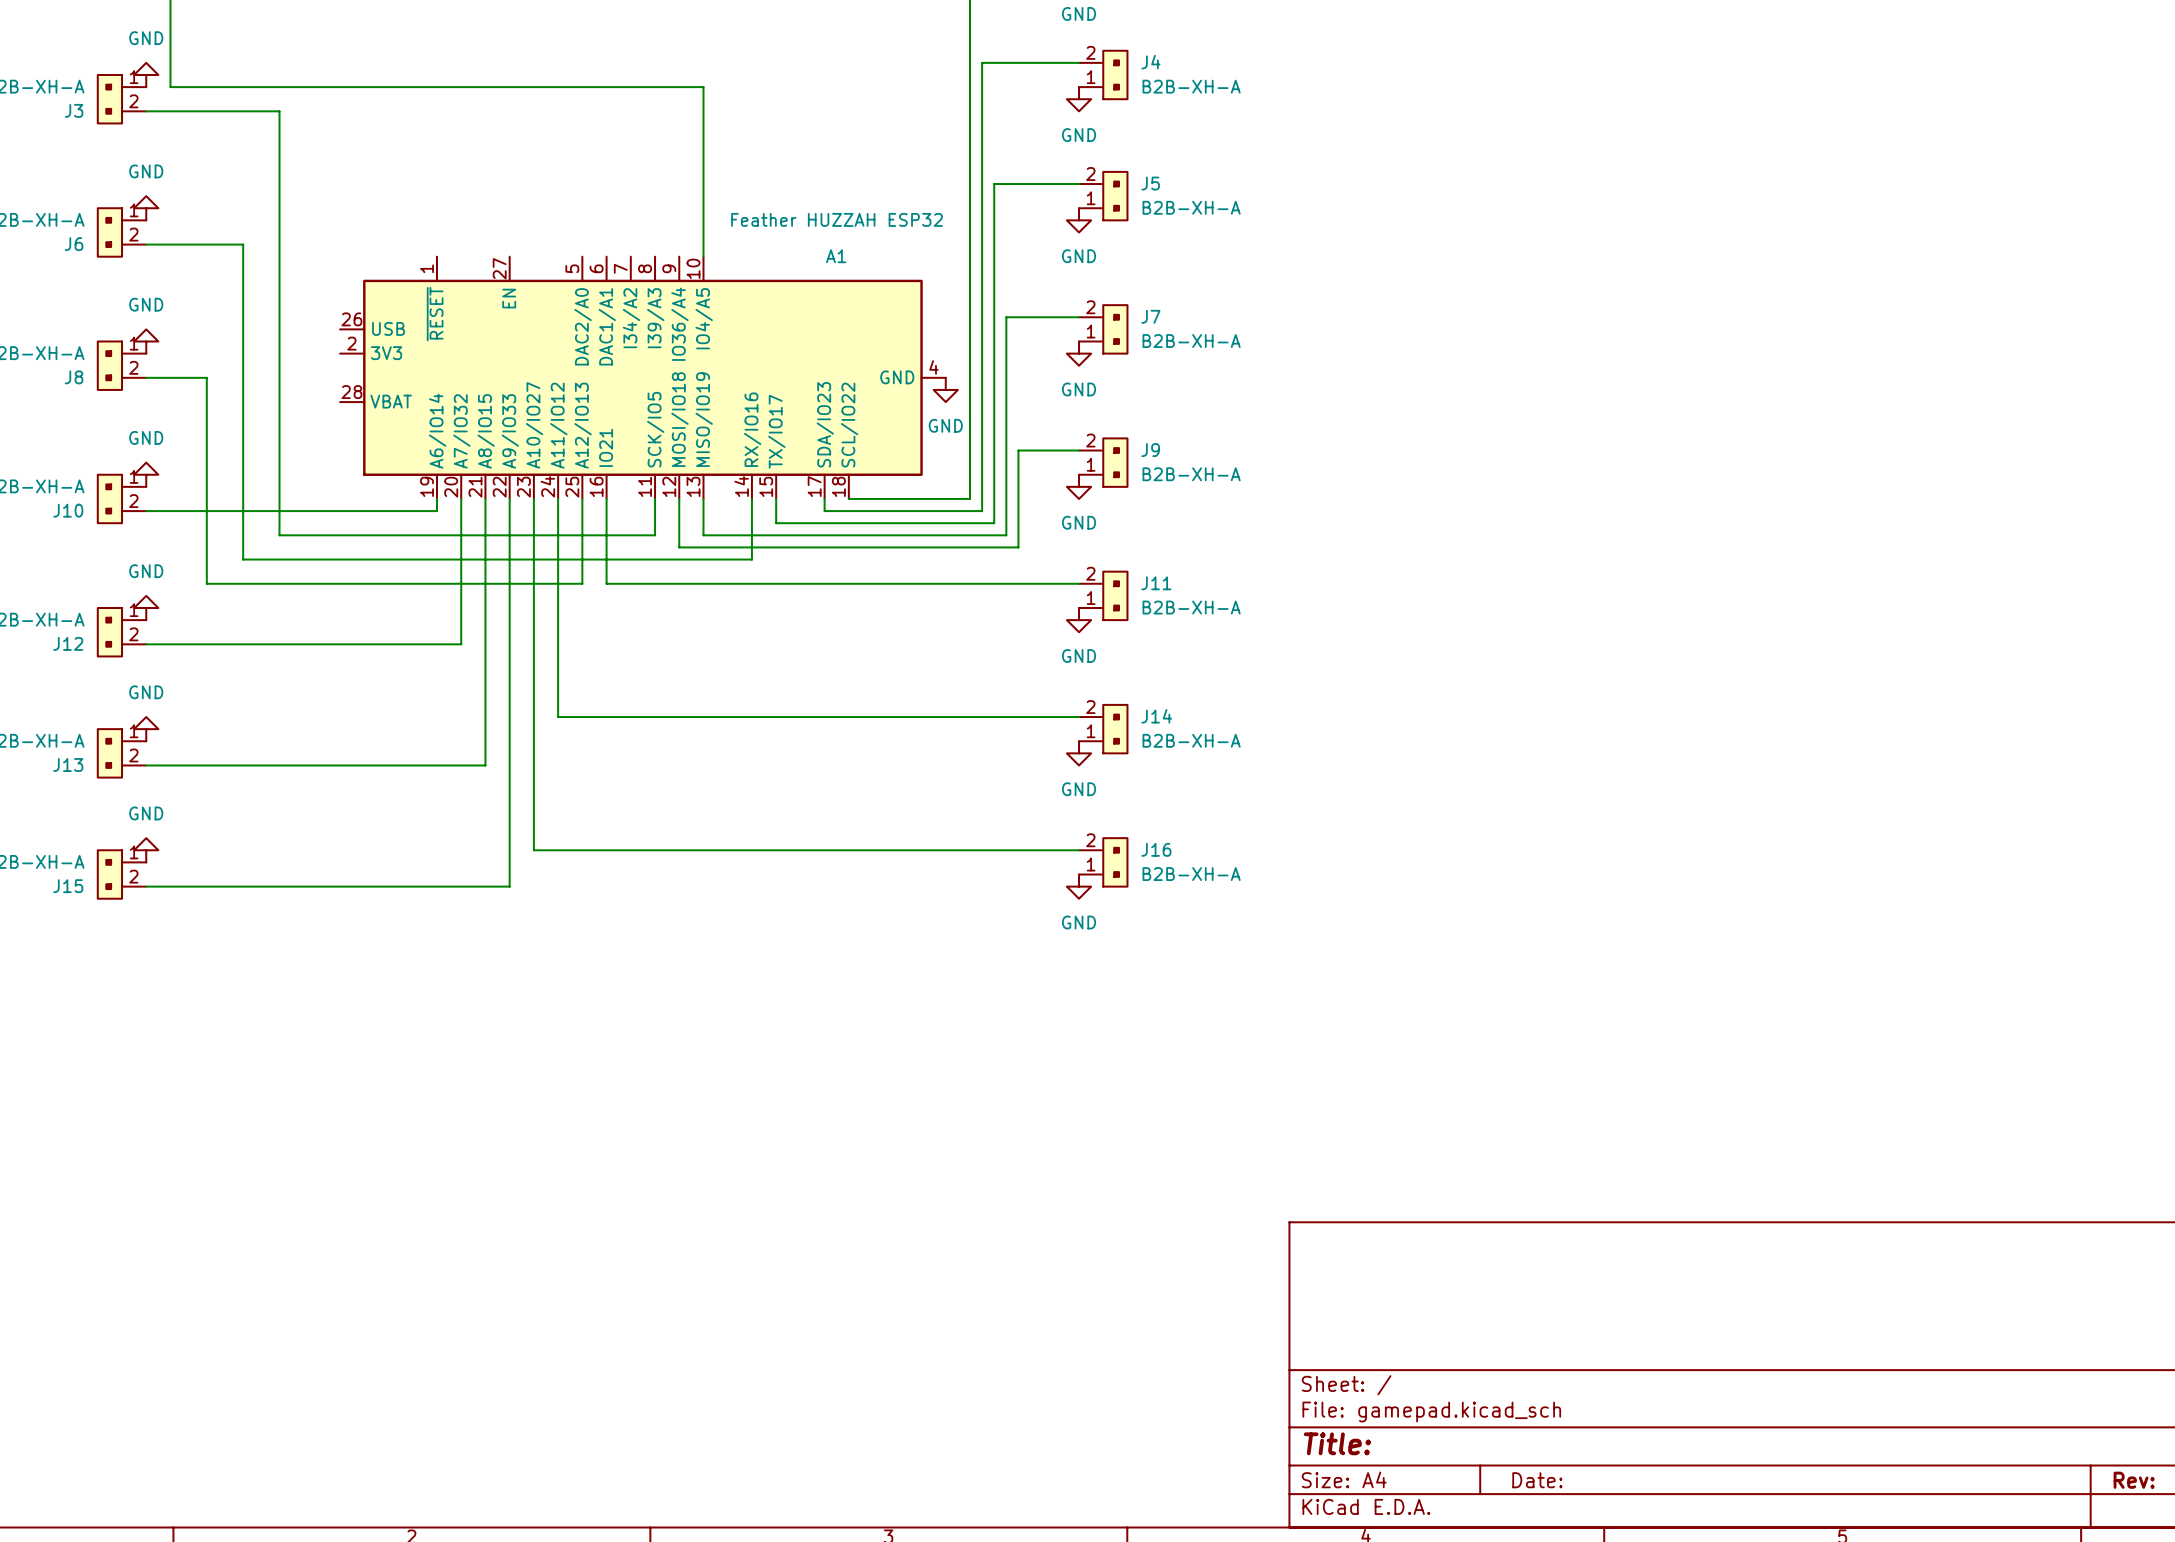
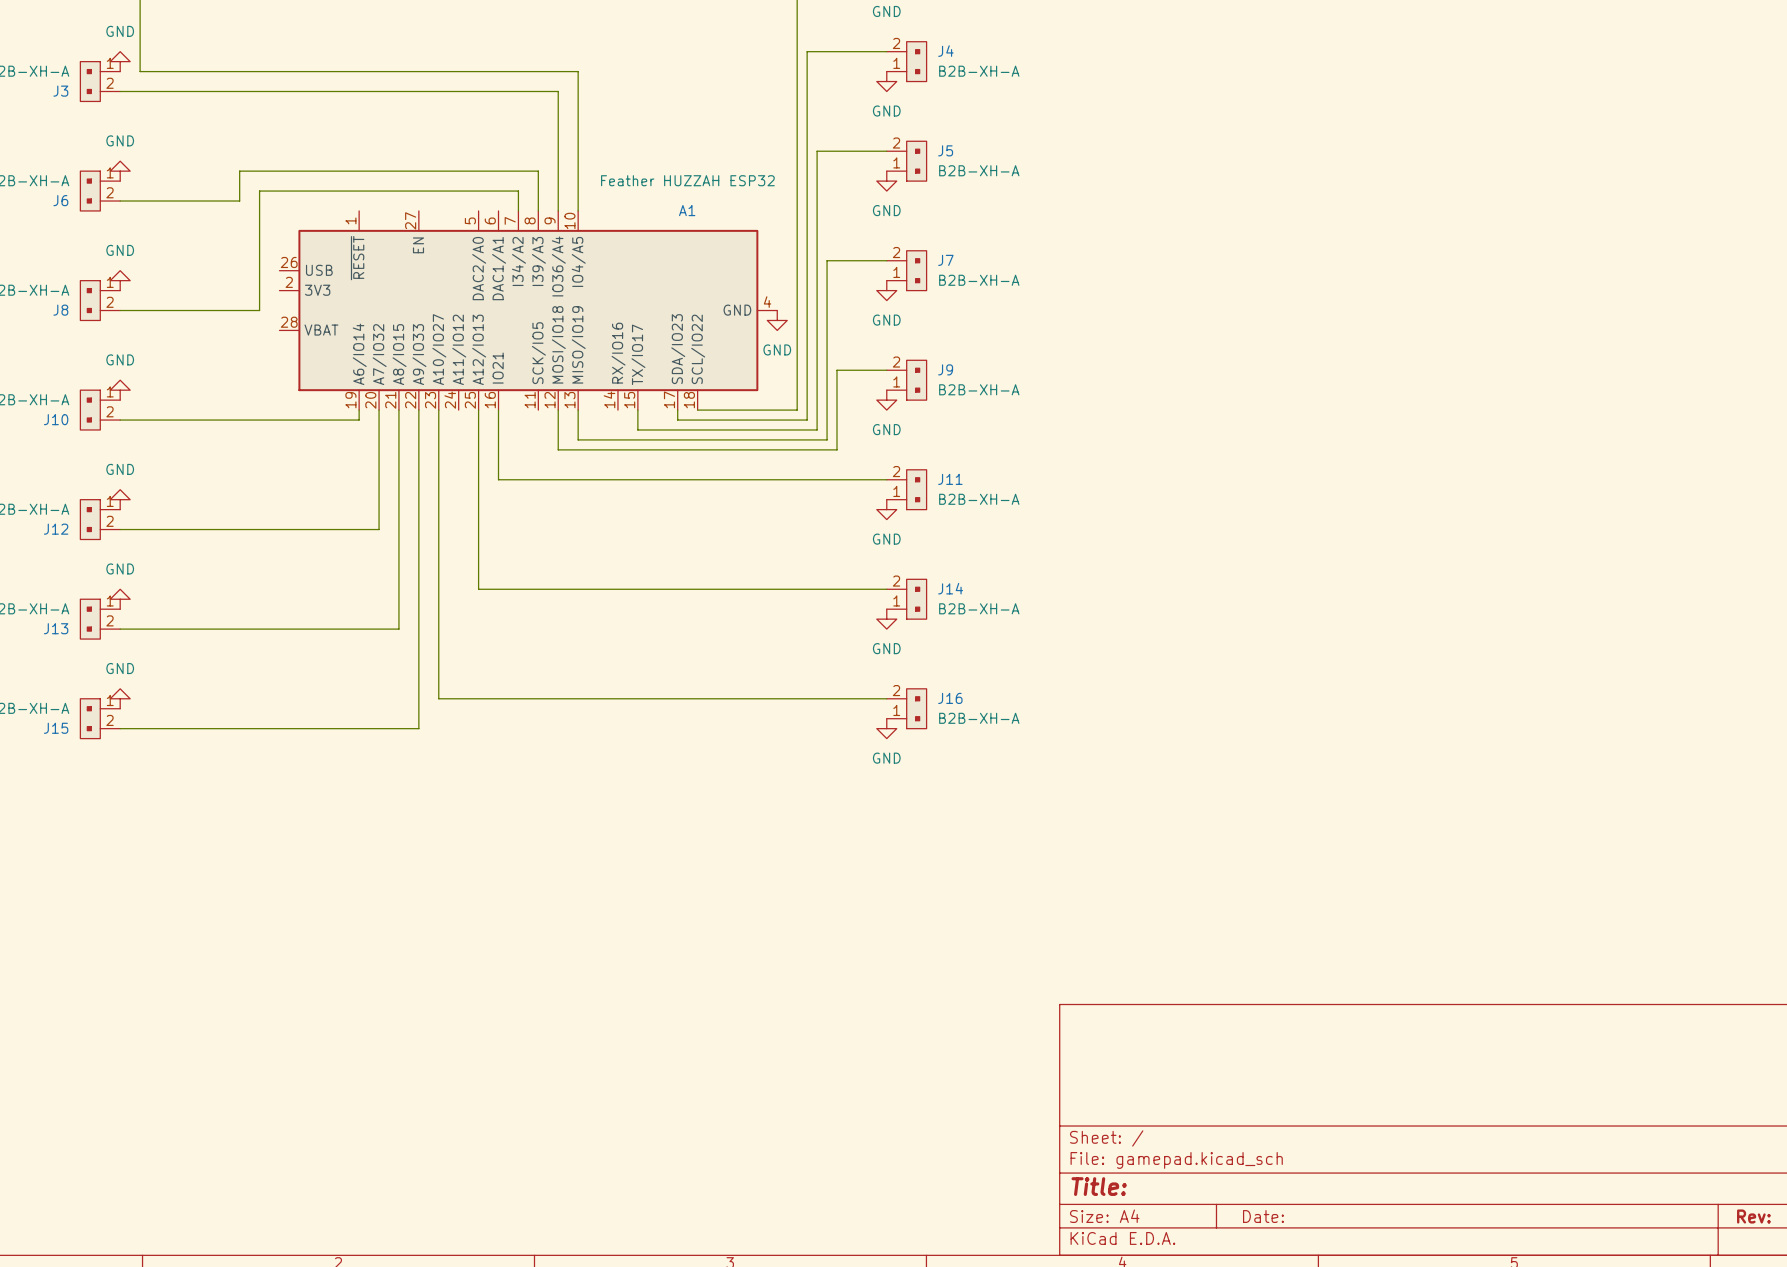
wire: (279, 111) (279, 535) (655, 535) (655, 498) -> (229, 91) (558, 91) (558, 210)
wire: (243, 244) (243, 559) (751, 559) (751, 498) -> (199, 201) (239, 201) (239, 171) (538, 171) (538, 210)
wire: (206, 377) (206, 583) (582, 583) -> (169, 310) (259, 310) (259, 191) (518, 191) (518, 210)
wire: (558, 498) (558, 717) (582, 717) -> (478, 479) (478, 589)

